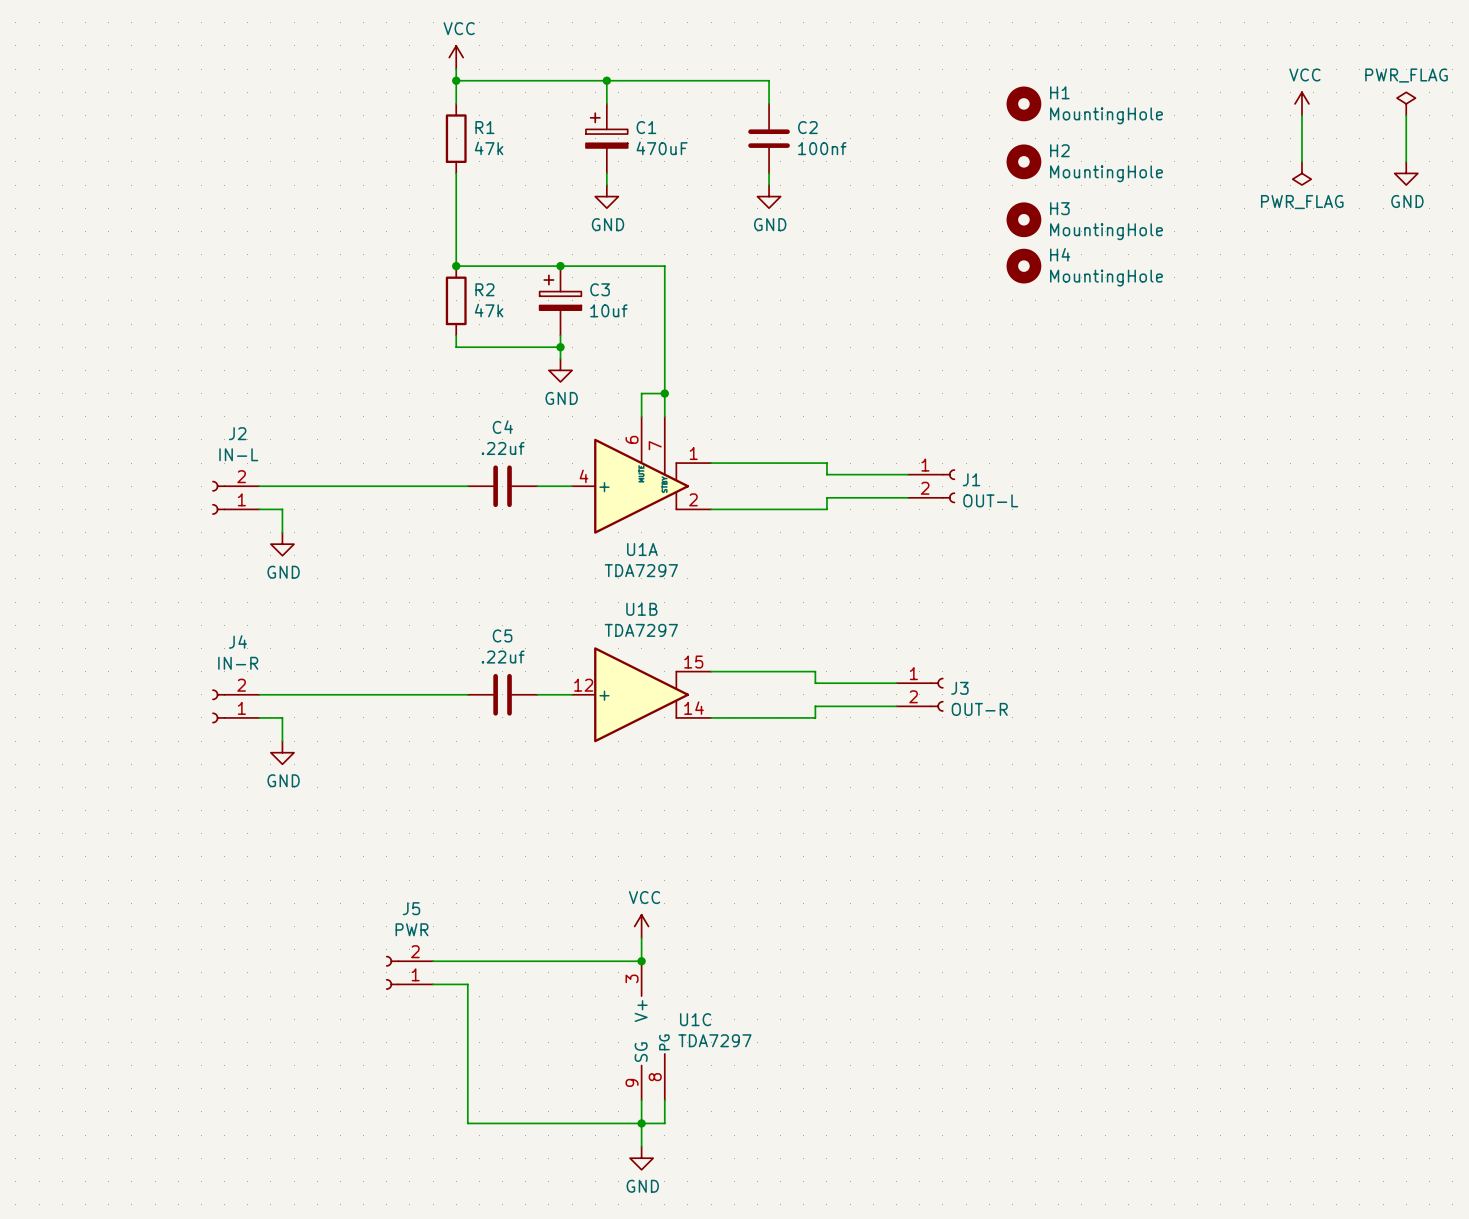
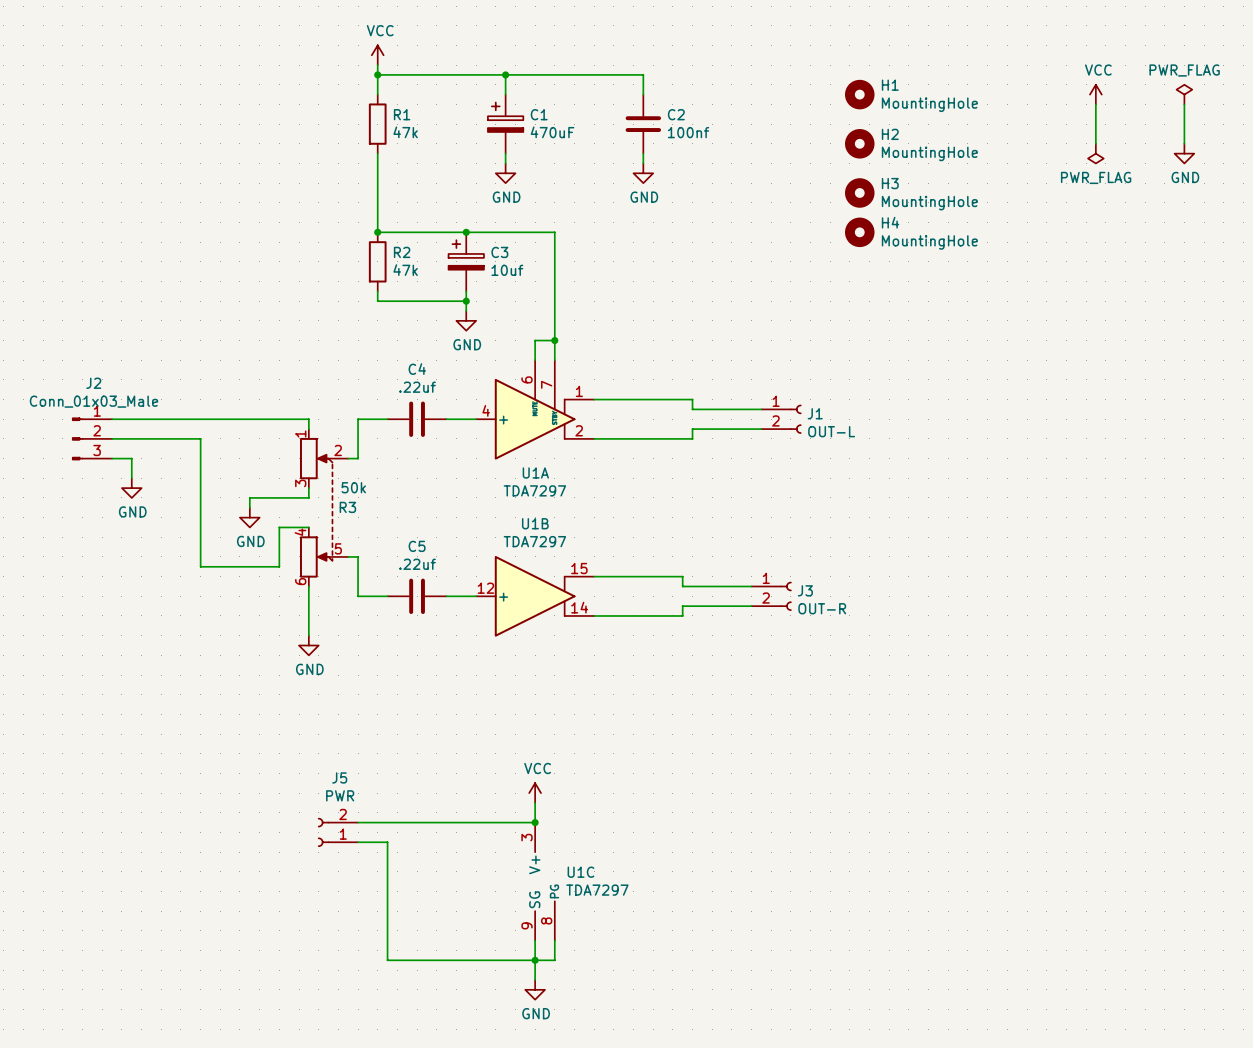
J2 value: IN-L (238, 454) -> Conn_01x03_Male (94, 401)
J2 symbol: [212, 480, 260, 515] -> [72, 417, 113, 461]
wire: none -> (112, 419) (210, 419)
wire: (375, 486) (433, 486) -> (308, 419) (308, 429)
wire: none -> (358, 419) (358, 458) (348, 458)
wire: none -> (112, 438) (200, 438) (200, 566) (279, 566) (279, 527) (308, 527)
wire: (259, 509) (282, 509) (282, 532) -> (112, 458) (131, 458) (131, 478)
power symbol: GND (282, 544) -> none
power symbol: none -> GND (131, 488)
wire: none -> (308, 488) (308, 497) (249, 497) (249, 507)
R3: none -> 50k (324, 507)
power symbol: none -> GND (249, 517)
wire: none -> (308, 586) (308, 635)
wire: (259, 694) (433, 694) -> (348, 556) (358, 556) (358, 596)
J4: IN-R (235, 706) -> none
wire: (259, 717) (282, 717) (282, 741) -> none
power symbol: GND (282, 752) -> none
power symbol: none -> GND (308, 645)

